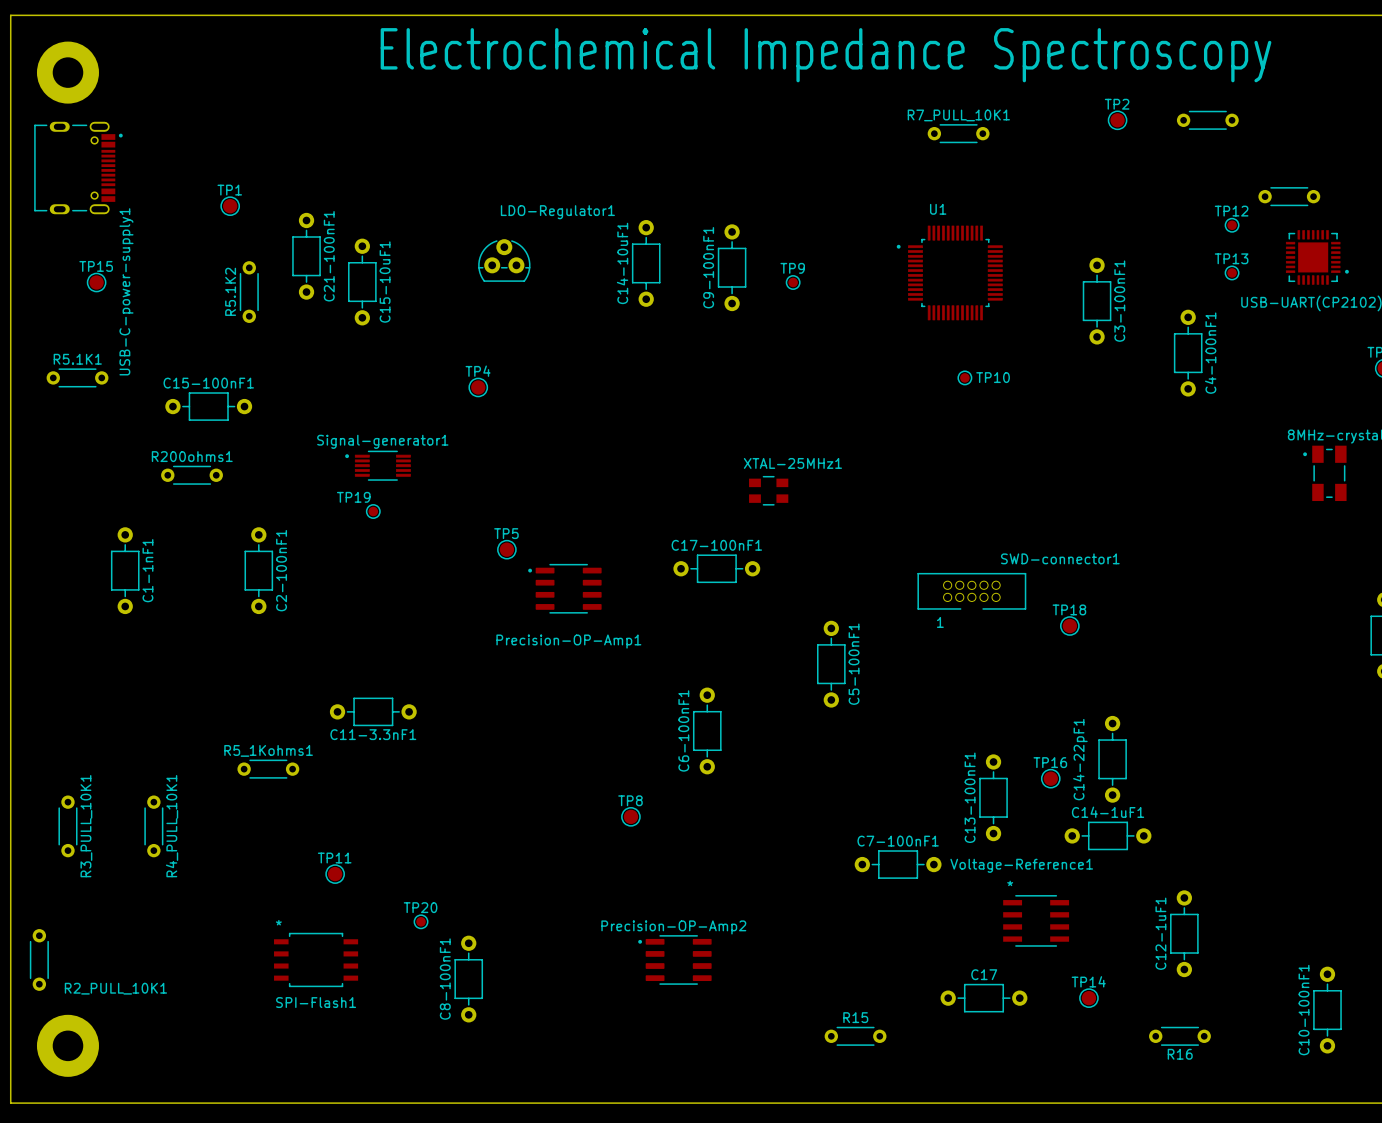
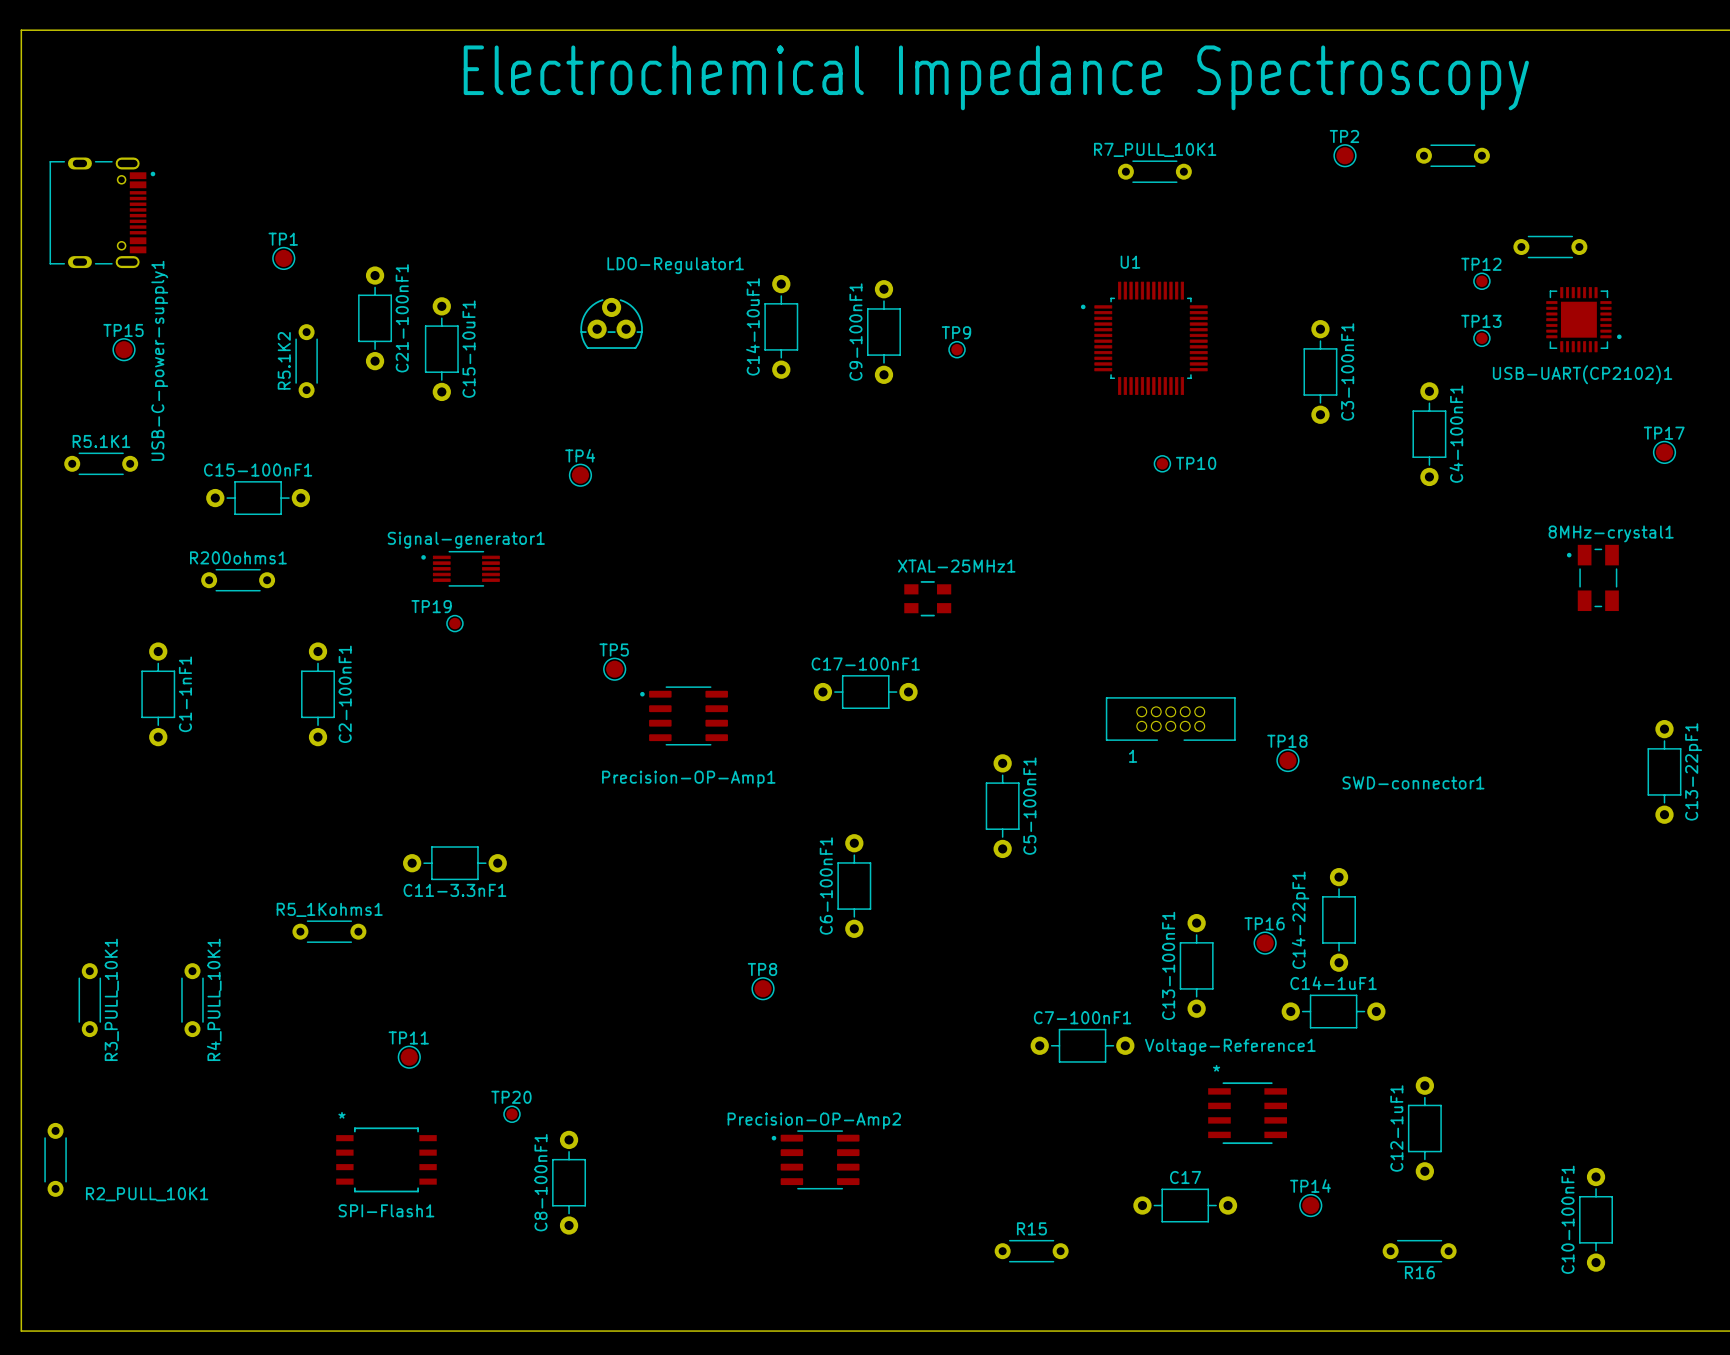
part: (67, 72) -> none
SWD-connector1 name position: SWD-connector1 (1060, 558) -> SWD-connector1 (1413, 782)
part: (67, 1045) -> none

